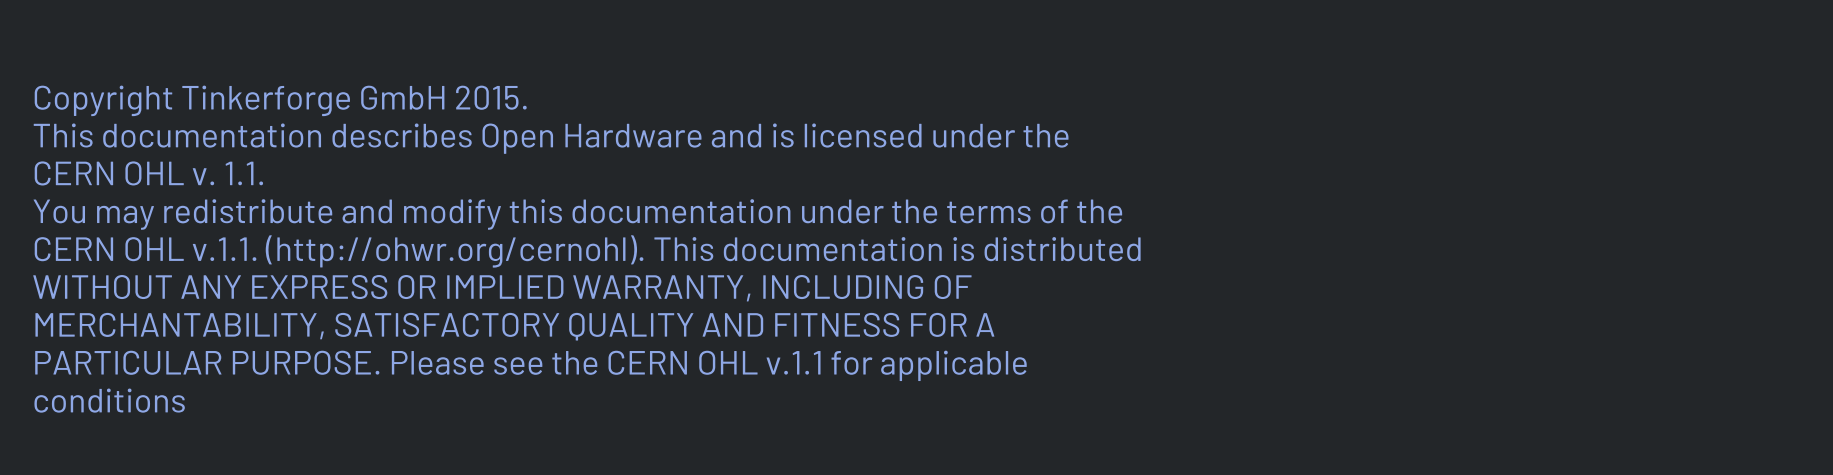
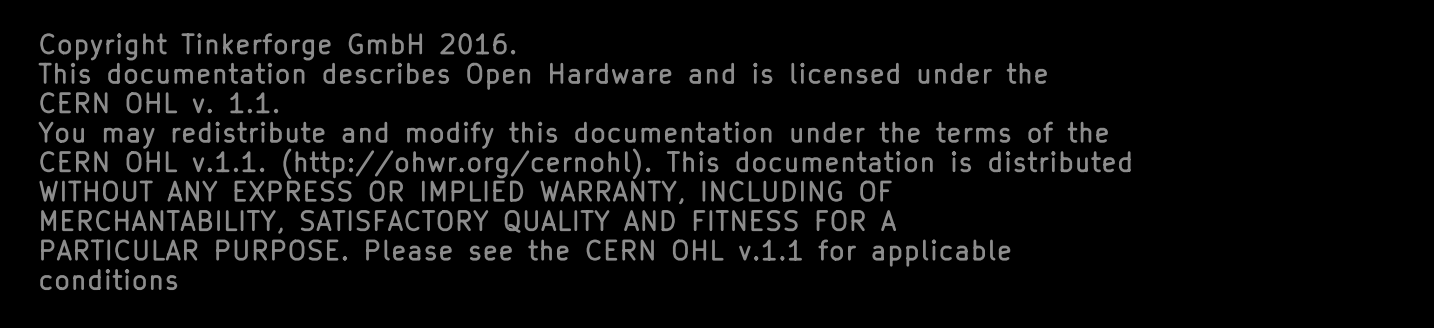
text: Copyright Tinkerforge GmbH 2015. (280, 100) -> Copyright Tinkerforge GmbH 2016. (277, 46)

